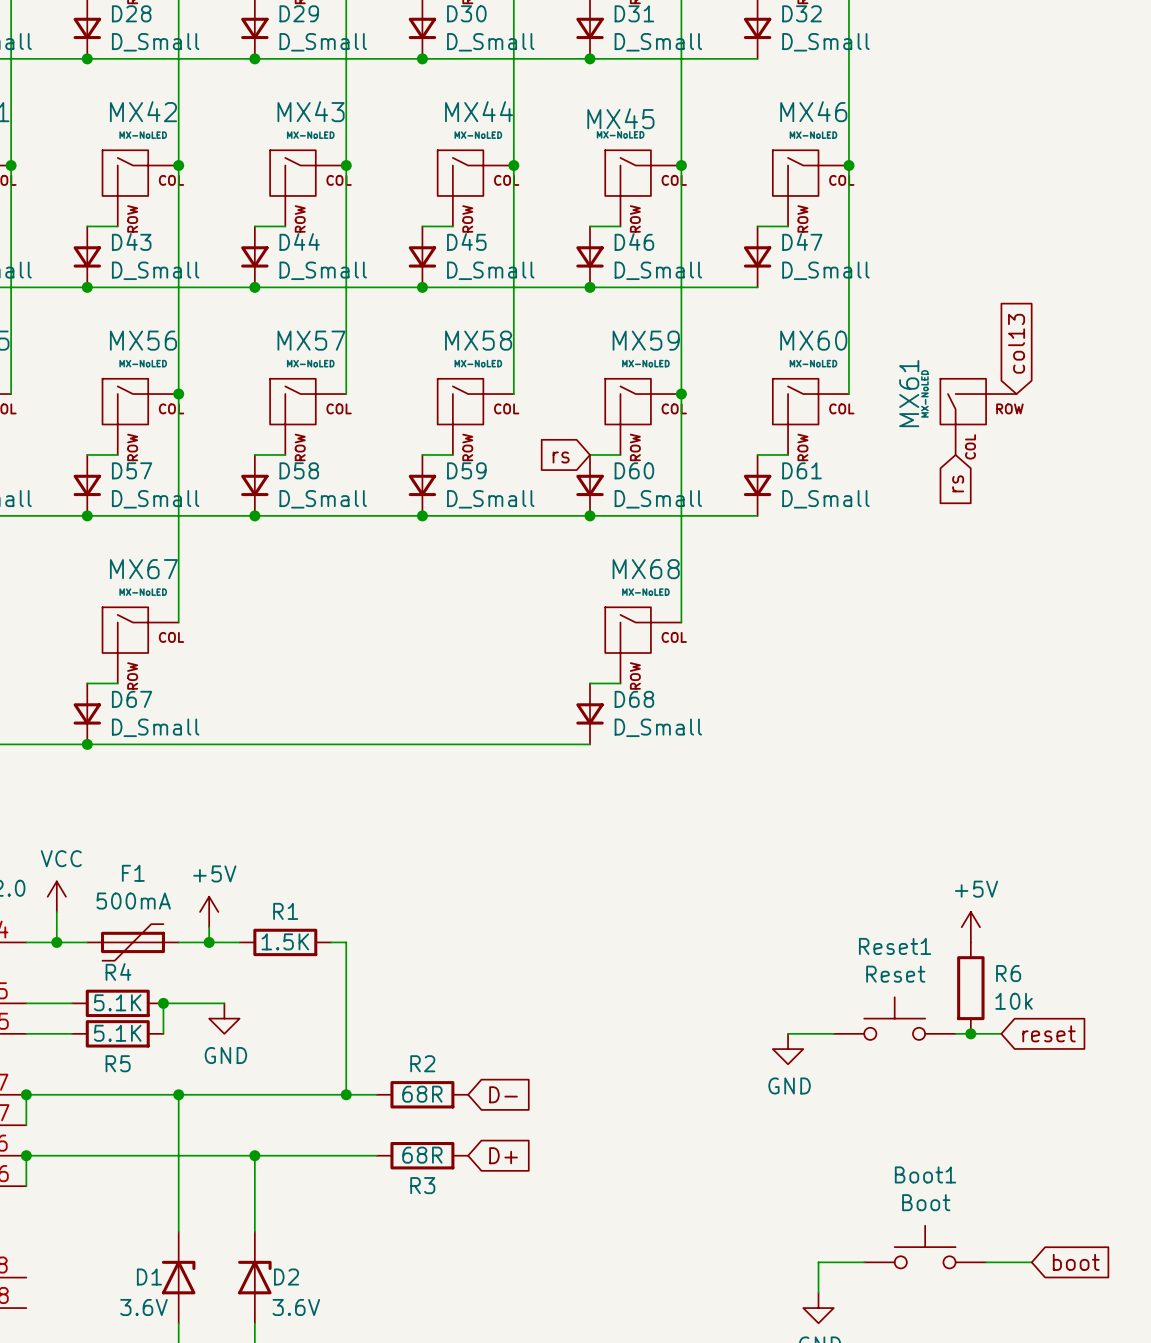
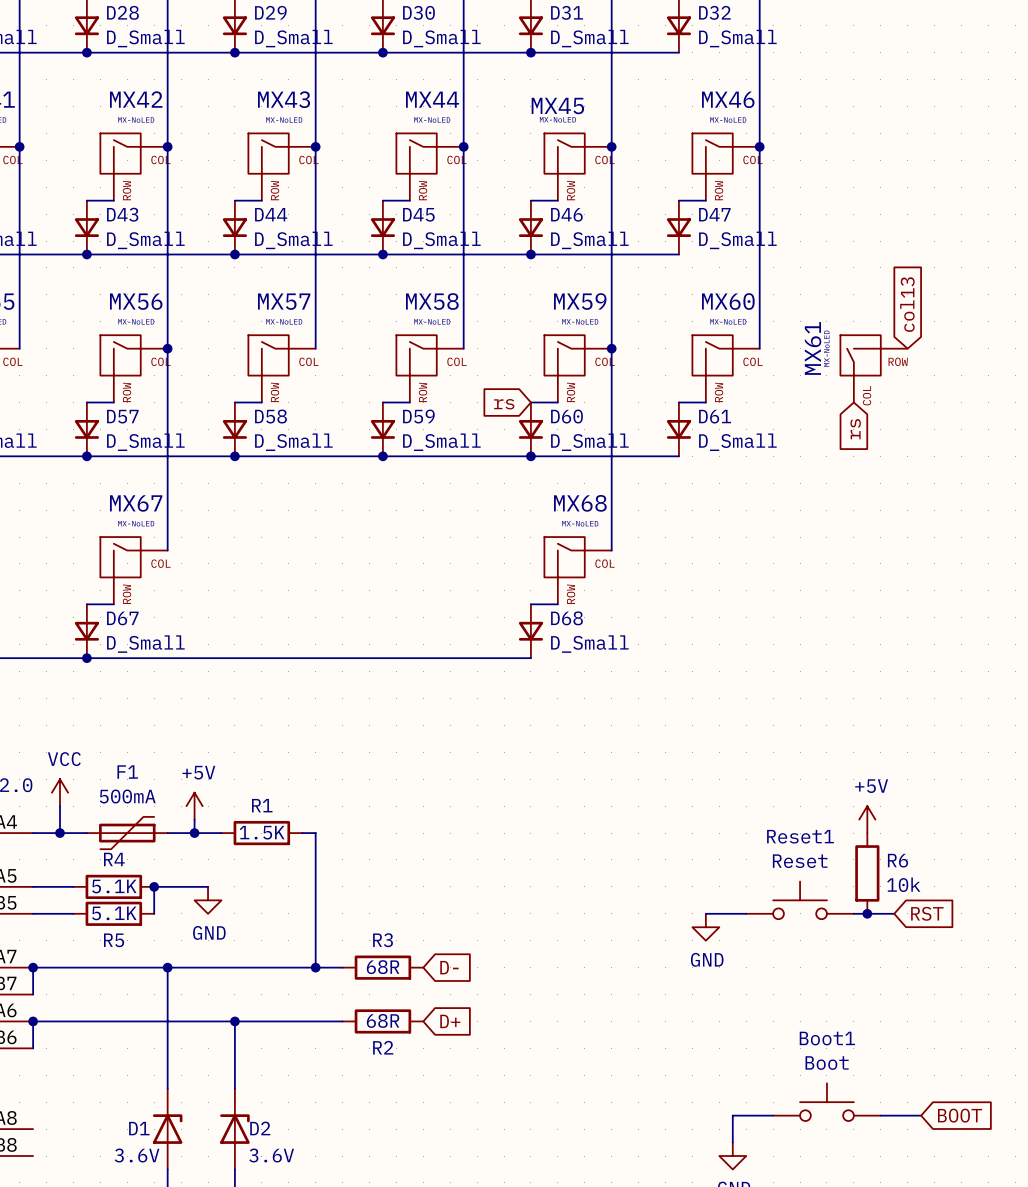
global label: reset (1049, 1033) -> RST (927, 913)
R2 name: R2 (422, 1063) -> R3 (383, 940)
R3 name: R3 (422, 1185) -> R2 (383, 1047)
global label: boot (1076, 1262) -> BOOT (960, 1115)

